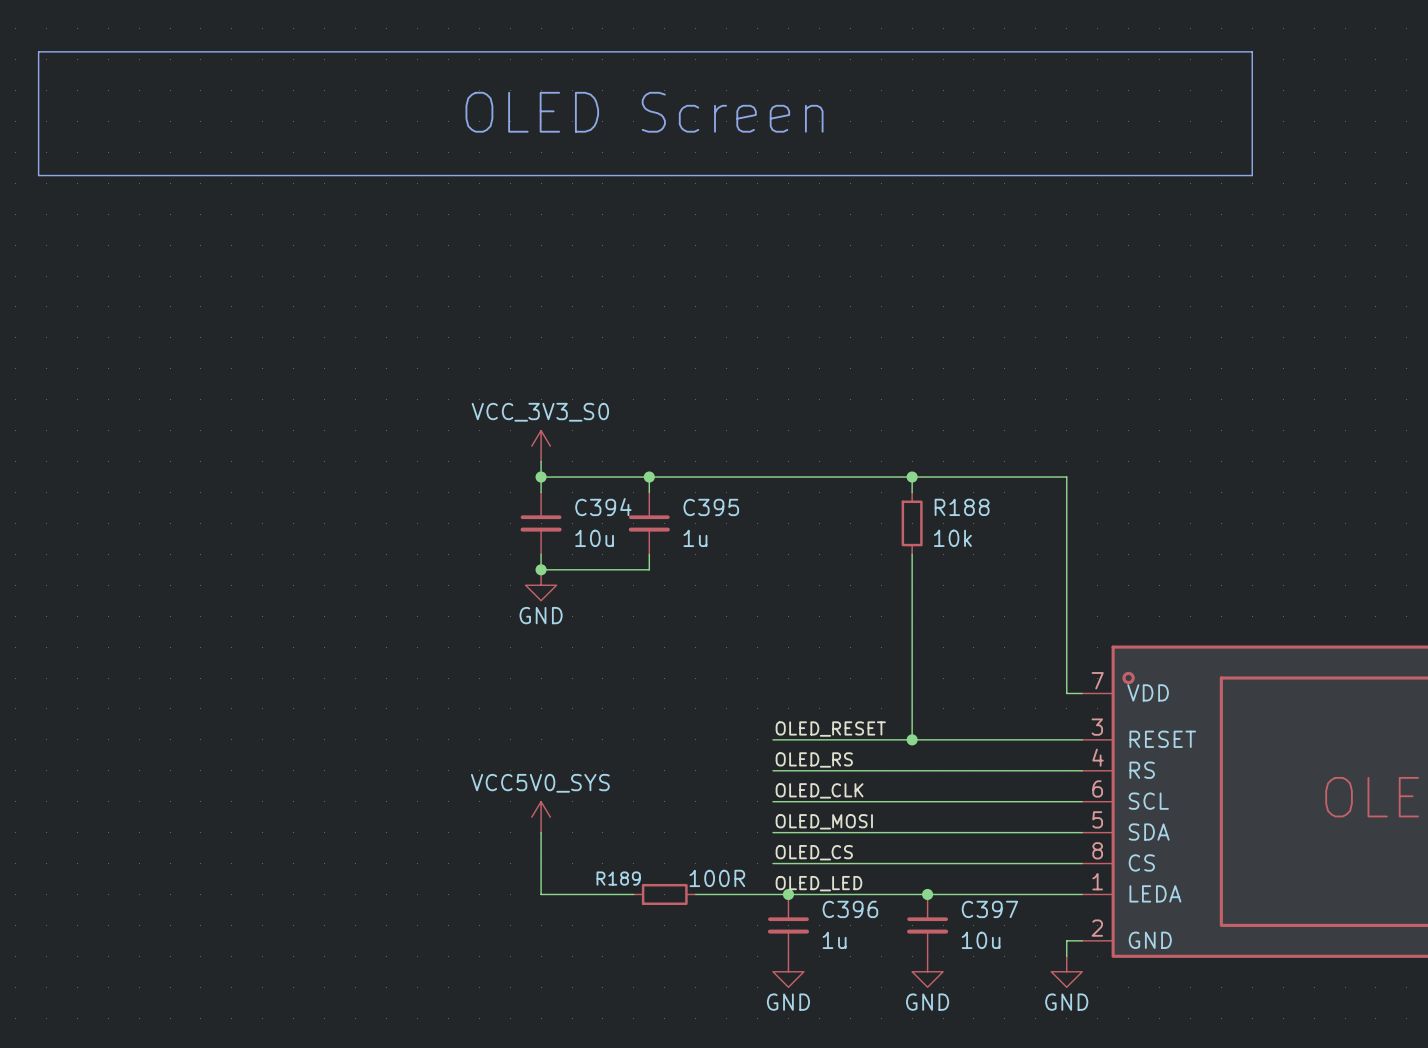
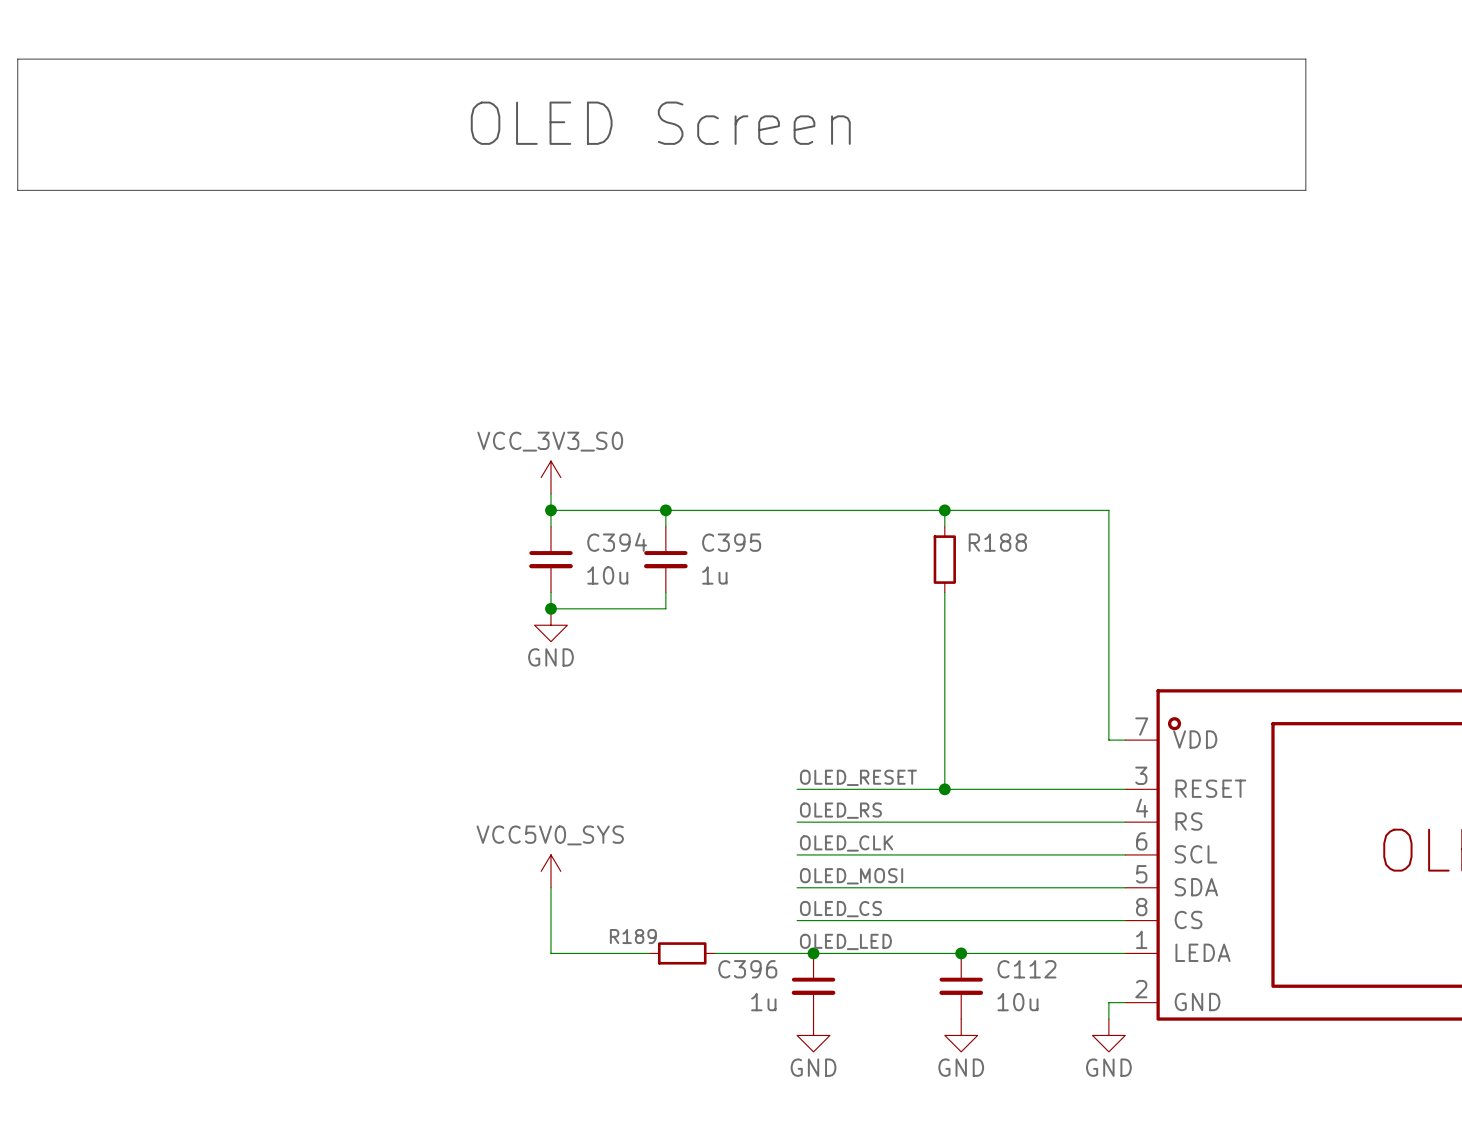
R188 value: 10k (952, 538) -> none
R189 value: 100R (717, 878) -> none
C396 name position: C396 (850, 909) -> C396 (747, 969)
C397 name: C397 (989, 909) -> C112 (1026, 969)
C396 value position: 1u (834, 940) -> 1u (763, 1002)

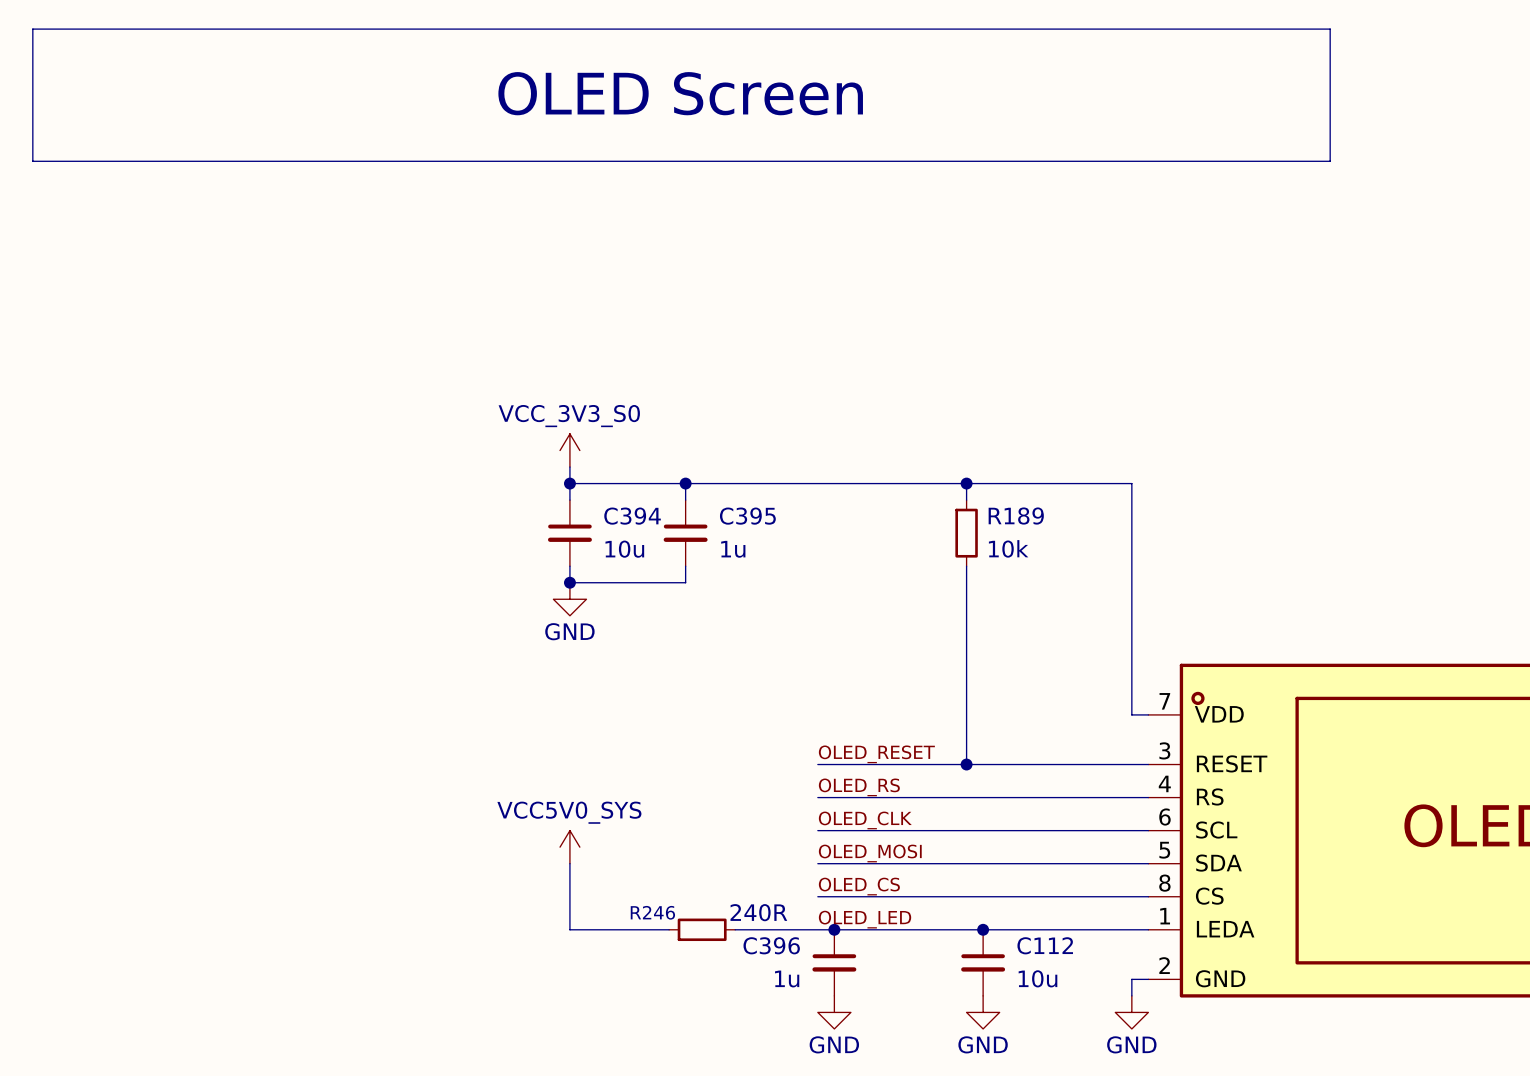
R188 name: R188 (997, 542) -> R189 (1016, 516)
R188 value: none -> 10k (1008, 548)
R189 name: R189 (633, 936) -> R246 (652, 912)
R189 value: none -> 240R (758, 912)

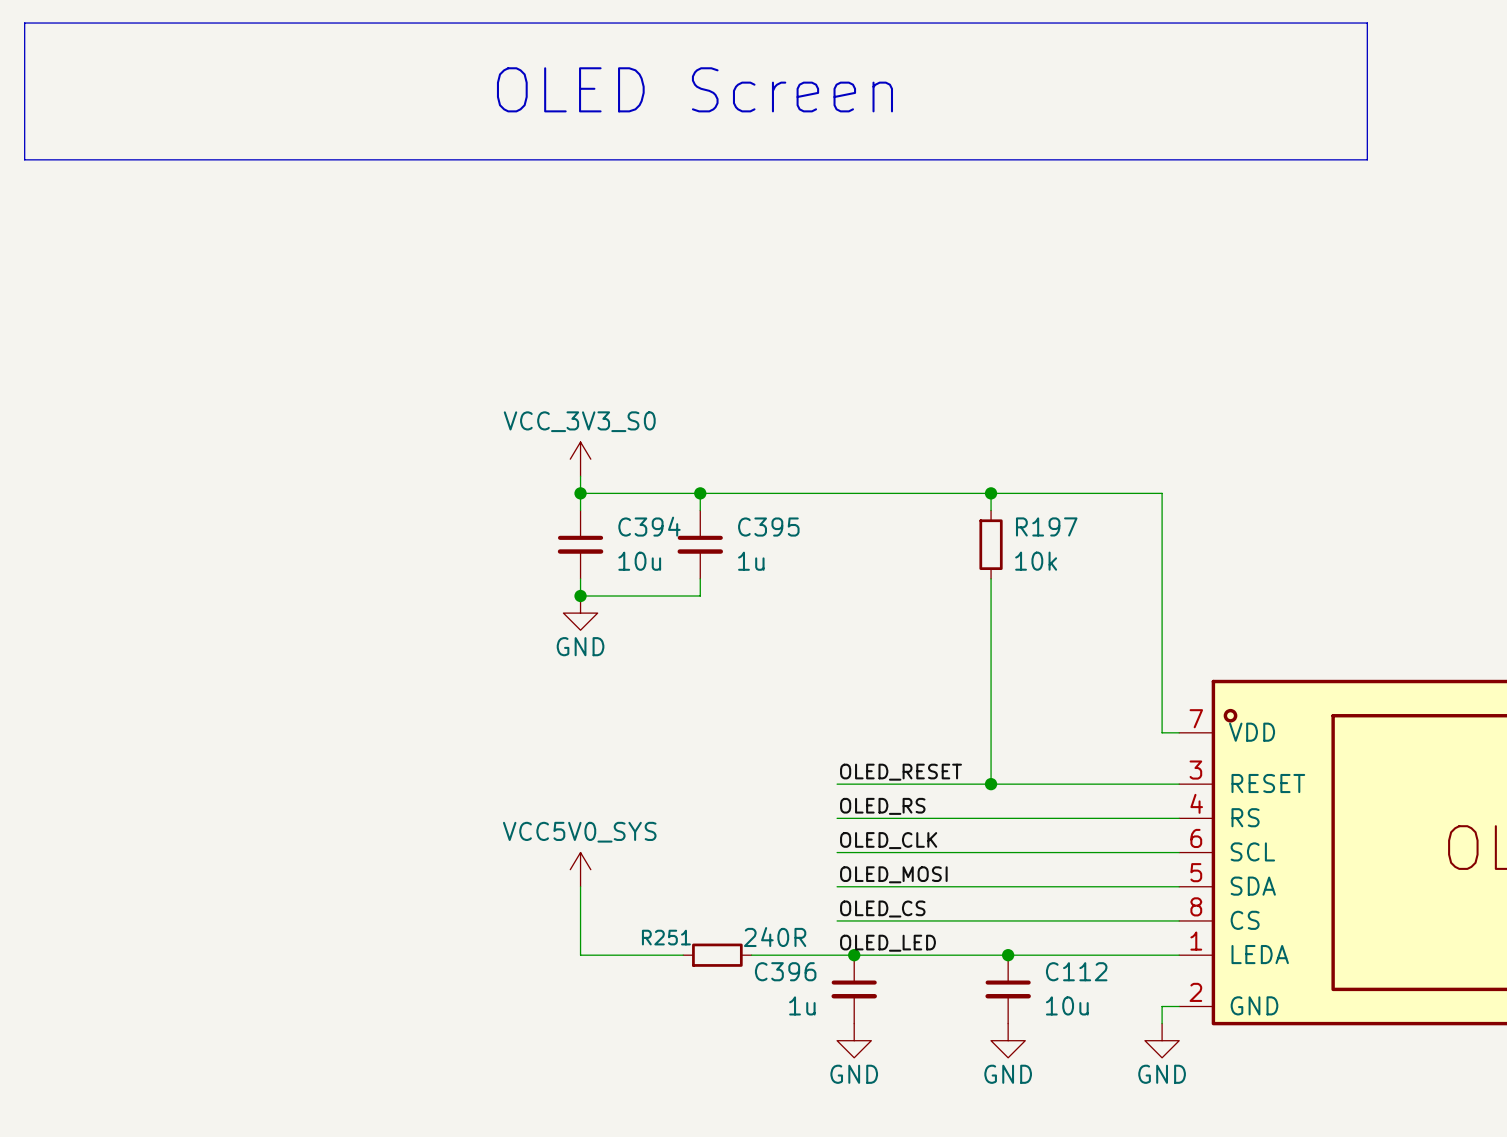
R189 name: R189 (1016, 516) -> R197 (1046, 526)
R246 name: R246 (652, 912) -> R251 (666, 937)

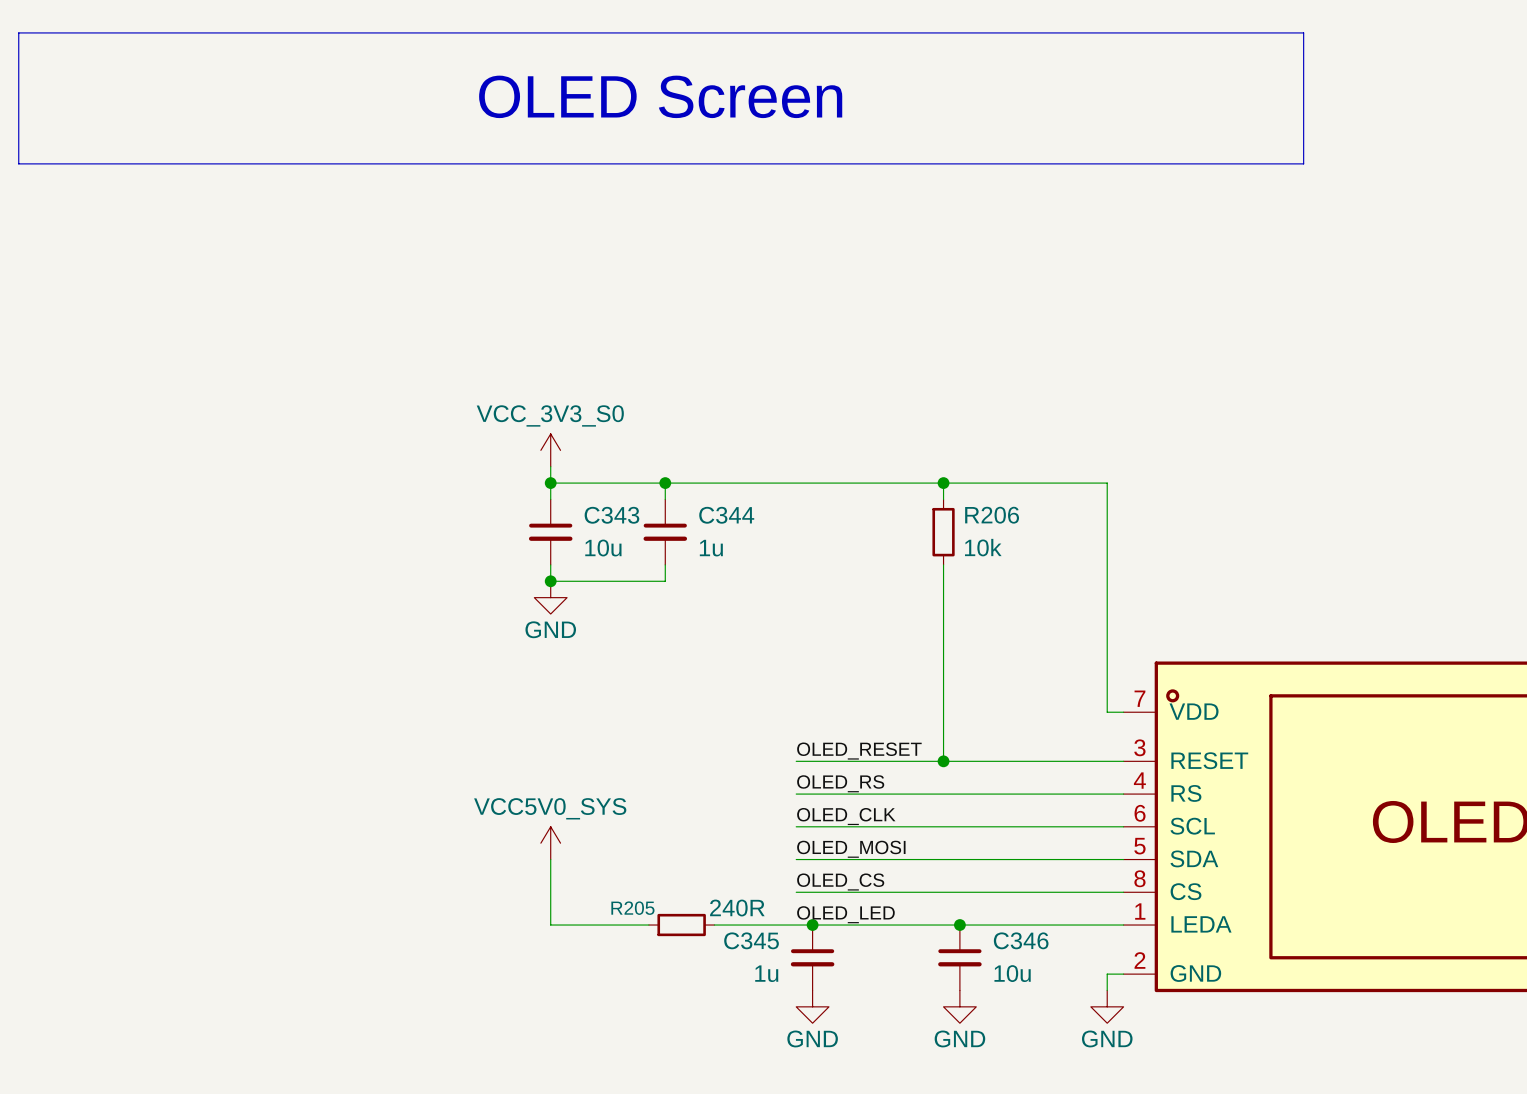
C394 name: C394 (649, 526) -> C343 (611, 515)
R197 name: R197 (1046, 526) -> R206 (992, 515)
C395 name: C395 (768, 527) -> C344 (726, 515)
R251 name: R251 (666, 937) -> R205 (632, 908)
C396 name: C396 (785, 971) -> C345 (751, 940)
C112 name: C112 (1076, 971) -> C346 (1021, 940)

